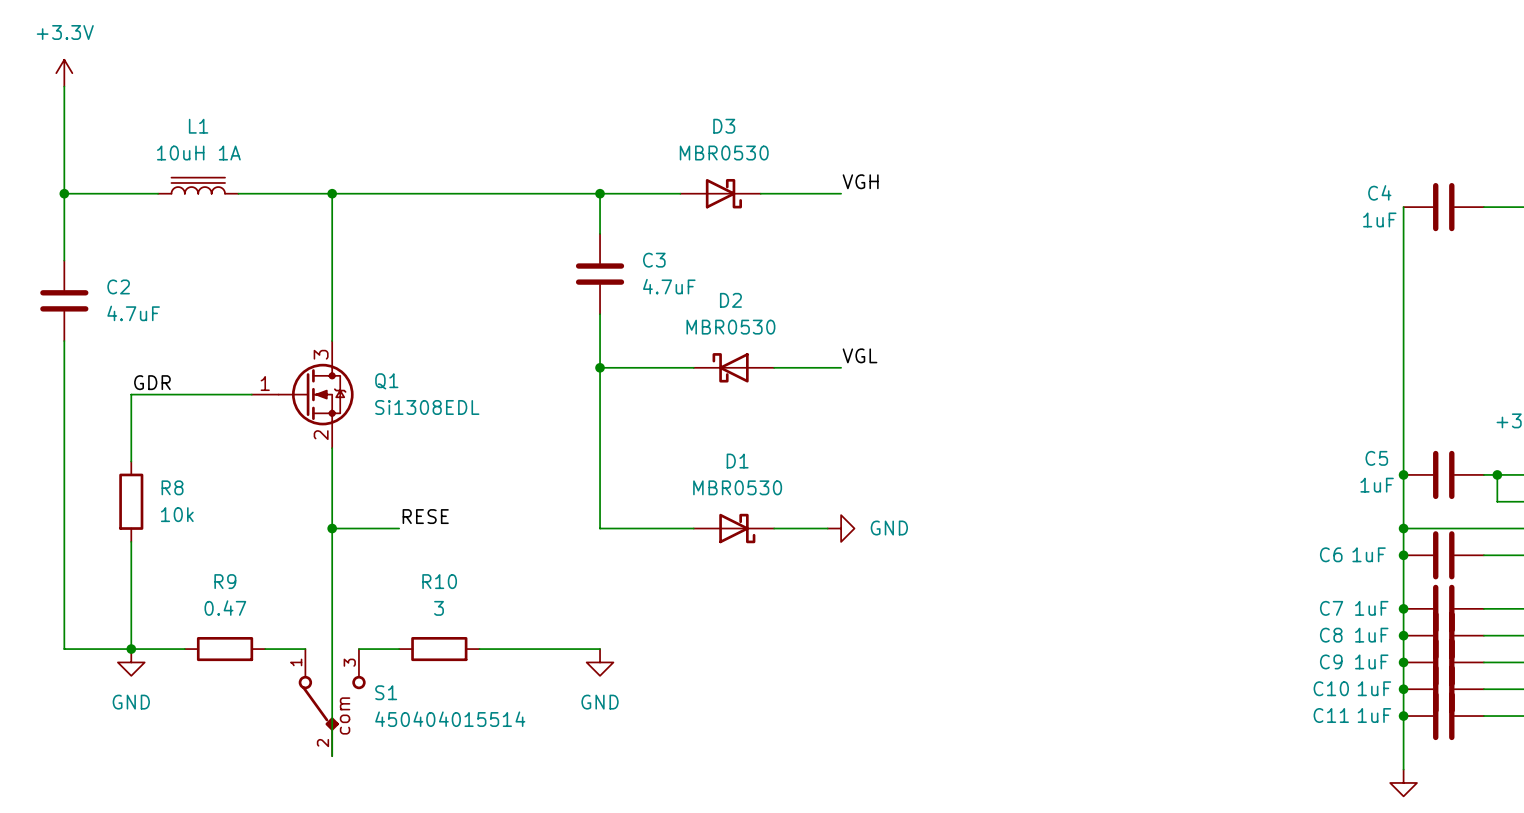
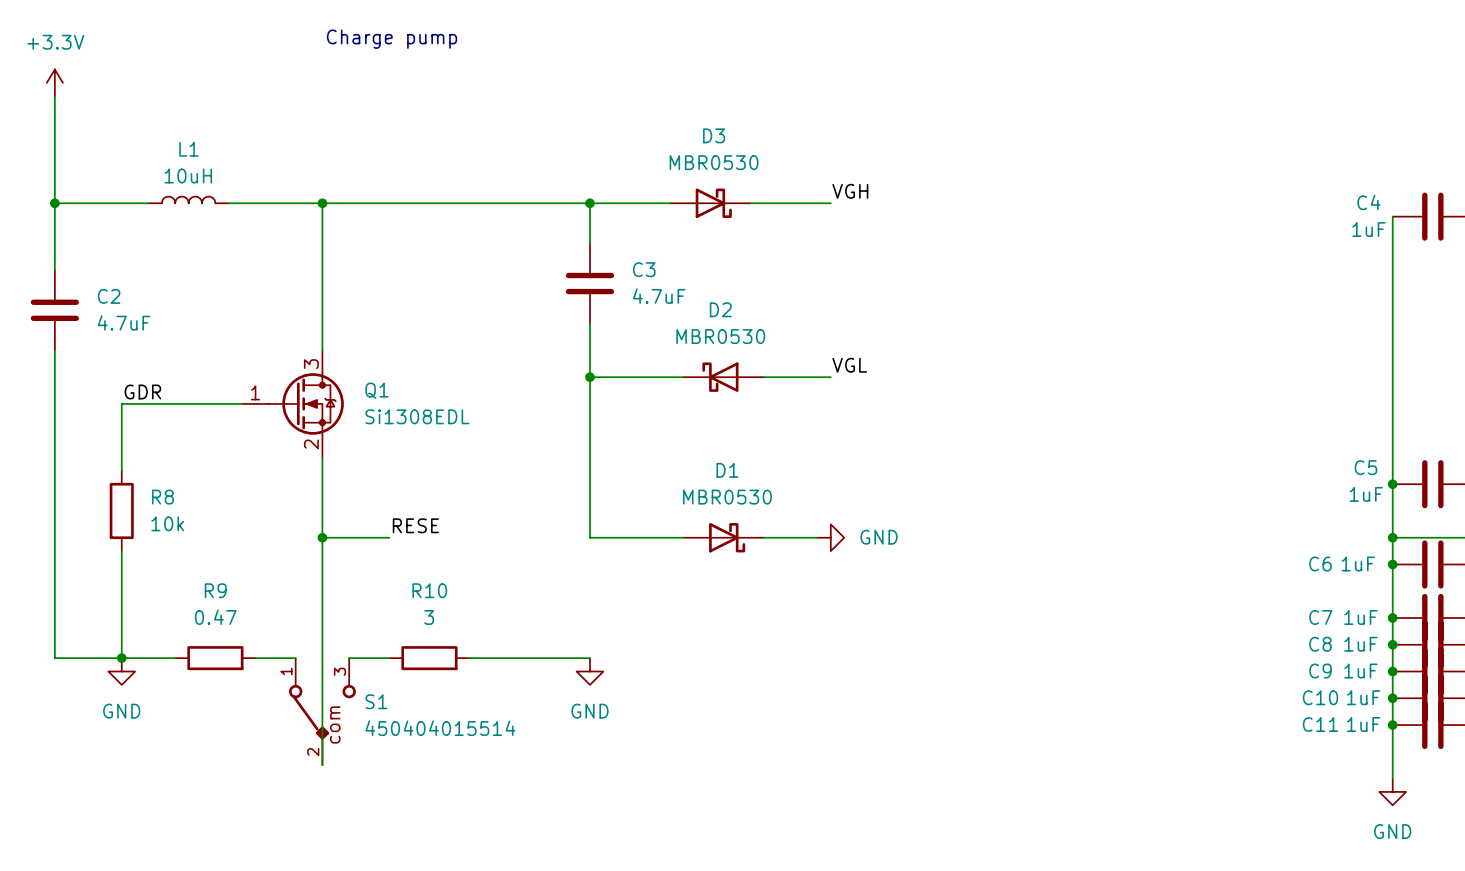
text: none -> Charge pump (392, 39)
L1 value: 10uH 1A (198, 153) -> 10uH (188, 176)
L1 symbol: [158, 177, 239, 194] -> [148, 196, 229, 204]

